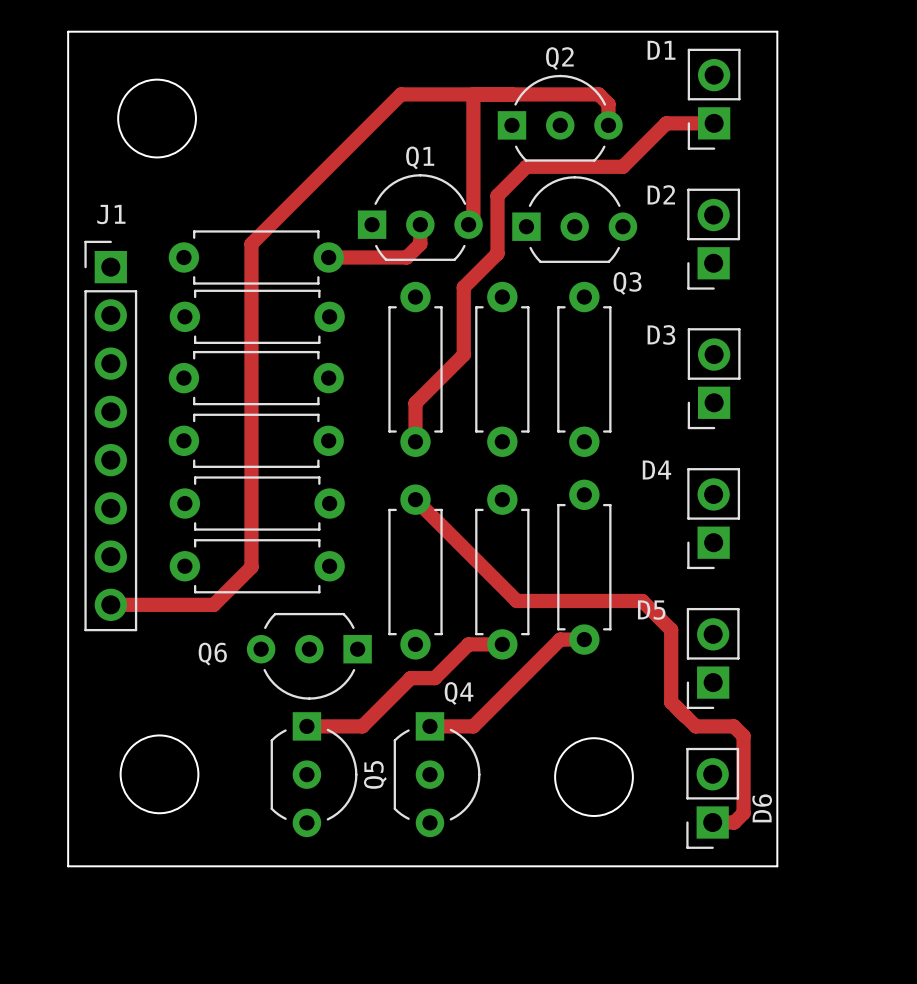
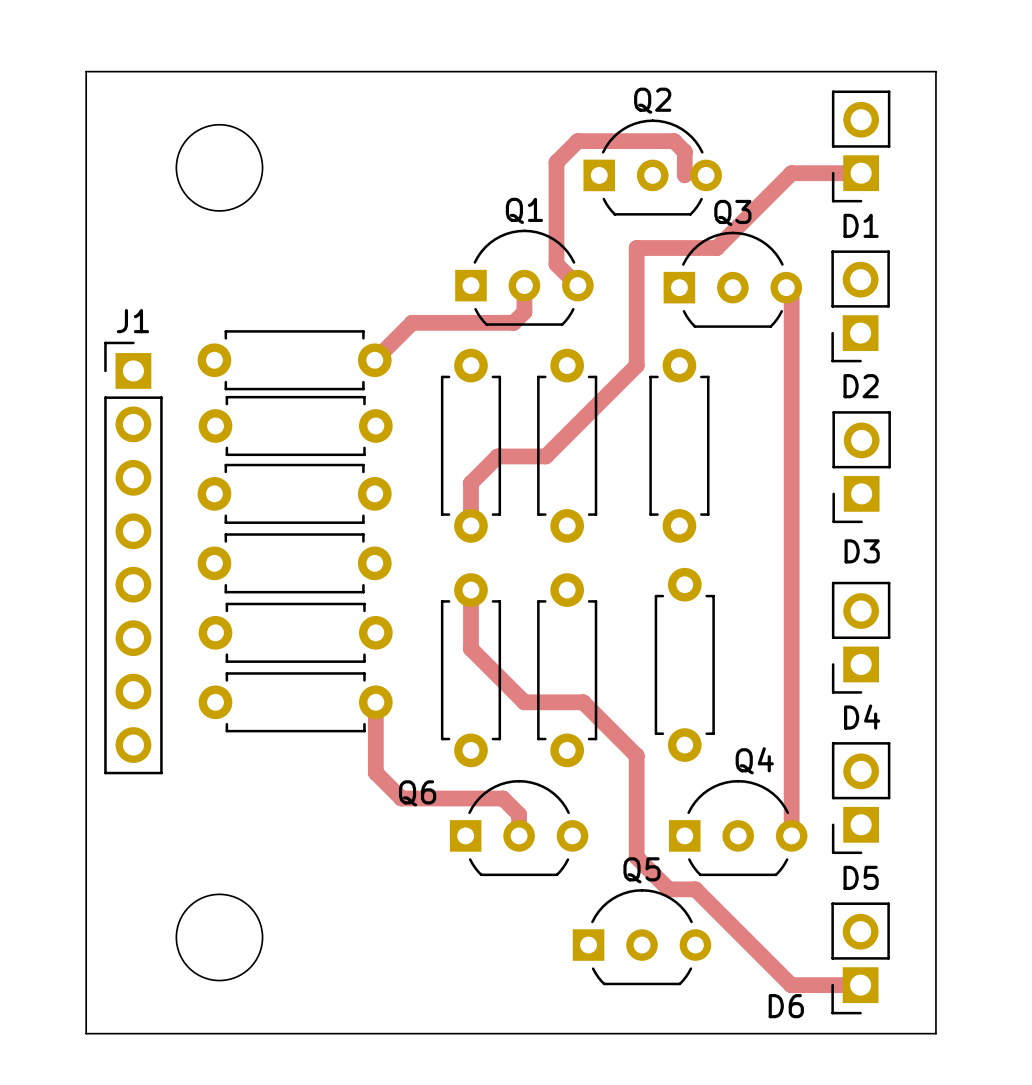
board edge: (777, 31) (777, 866) (68, 866) -> (871, 71) (935, 71) (935, 1033) (86, 1033) (86, 996)
D1 name position: D1 (661, 50) -> D1 (861, 225)
track: (473, 94) (473, 219) (468, 224) -> none
track: (511, 94) (401, 94) (251, 243) (251, 567) (213, 604) (110, 604) -> (577, 141) (556, 162) (556, 264) (577, 285)
D1 position: (714, 99) -> (861, 146)
round board edge position: (157, 118) -> (219, 167)
Q2 position: (560, 118) -> (652, 167)
track: (704, 123) (666, 123) (622, 166) (526, 166) (497, 195) (497, 253) (463, 287) (463, 354) (439, 379) -> (791, 173) (716, 248) (636, 248) (636, 365) (545, 456) (497, 456)
track: none -> (801, 173) (861, 173)
D2 name position: D2 (661, 194) -> D2 (861, 386)
J1 name position: J1 (111, 214) -> J1 (132, 321)
Q1 position: (420, 217) -> (524, 277)
Q3 position: (574, 219) -> (732, 279)
track: (420, 224) (420, 243) (406, 257) (328, 257) -> none
track: none -> (524, 285) (524, 312) (513, 322) (412, 322) (374, 360)
track: none -> (786, 287) (791, 293) (791, 835)
D2 position: (713, 239) -> (860, 306)
part: (256, 257) -> none
Q3 name position: Q3 (627, 283) -> Q3 (732, 212)
part: none -> (294, 360)
part: (257, 316) -> none
D3 name position: D3 (661, 334) -> D3 (862, 551)
part: none -> (295, 425)
part position: (584, 369) -> (679, 445)
part: (256, 378) -> none
D3 position: (714, 378) -> (861, 467)
part: none -> (294, 493)
J1 position: (110, 435) -> (133, 557)
part: (256, 440) -> none
D4 name position: D4 (656, 470) -> D4 (862, 717)
part: none -> (294, 563)
track: (415, 499) (516, 600) (642, 600) (671, 629) (671, 702) (685, 716) -> (470, 590) (470, 648) (524, 702) (583, 702) (636, 755) (636, 857) (668, 889) (695, 889) (791, 985) (860, 985)
part: (257, 503) -> none
D4 position: (713, 518) -> (861, 637)
part: none -> (295, 632)
part: (257, 566) -> none
part position: (584, 567) -> (684, 664)
part: none -> (295, 702)
track: none -> (375, 702) (375, 772) (401, 798) (503, 798) (519, 814) (519, 835)
D5 name position: D5 (651, 610) -> D5 (861, 877)
track: (584, 639) (560, 639) (473, 726) (429, 726) -> none
track: (502, 644) (468, 644) (434, 678) (410, 678) (362, 726) (306, 726) -> none
Q6 rotation: 0° (309, 656) -> 180° (519, 828)
Q6 position: (309, 656) -> (519, 828)
D5 position: (713, 658) -> (861, 798)
track: (676, 706) (695, 726) (733, 726) (743, 736) (743, 813) (734, 822) (712, 822) -> none
round board edge: [554, 737, 634, 817] -> none
round board edge position: (159, 774) -> (219, 937)
Q5 rotation: 0° (314, 774) -> 90° counterclockwise (642, 937)
Q5 position: (314, 774) -> (642, 937)
Q4 rotation: 0° (437, 774) -> 90° counterclockwise (738, 828)
Q4 position: (437, 774) -> (738, 828)
D6 position: (712, 798) -> (860, 958)
D6 name rotation: 0° (762, 808) -> 90° clockwise (786, 1006)
D6 name position: D6 (762, 808) -> D6 (786, 1006)

